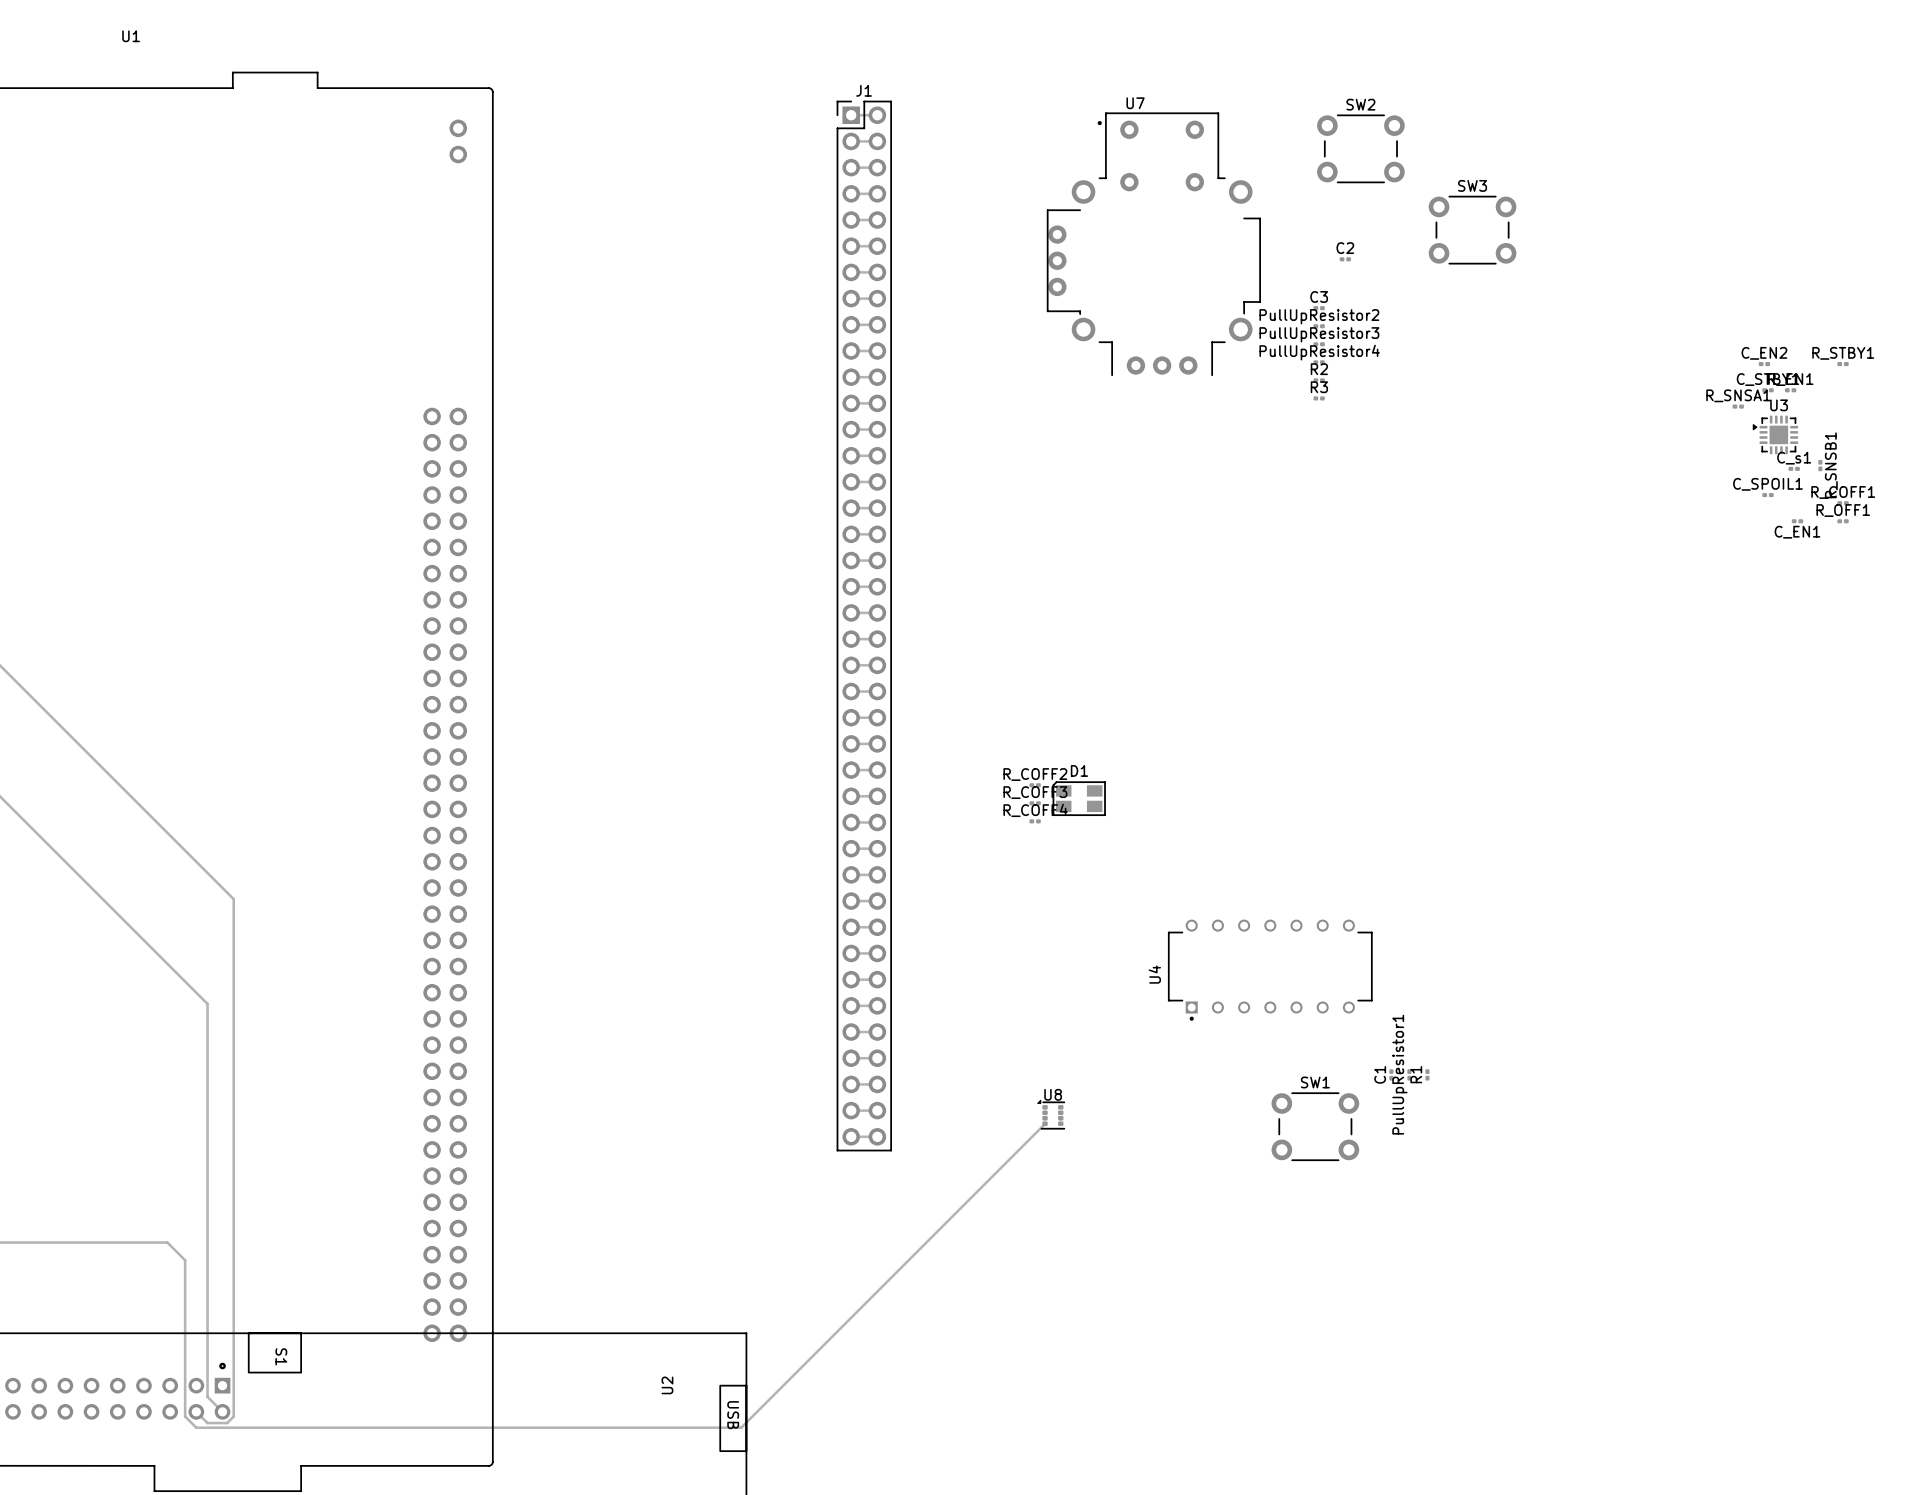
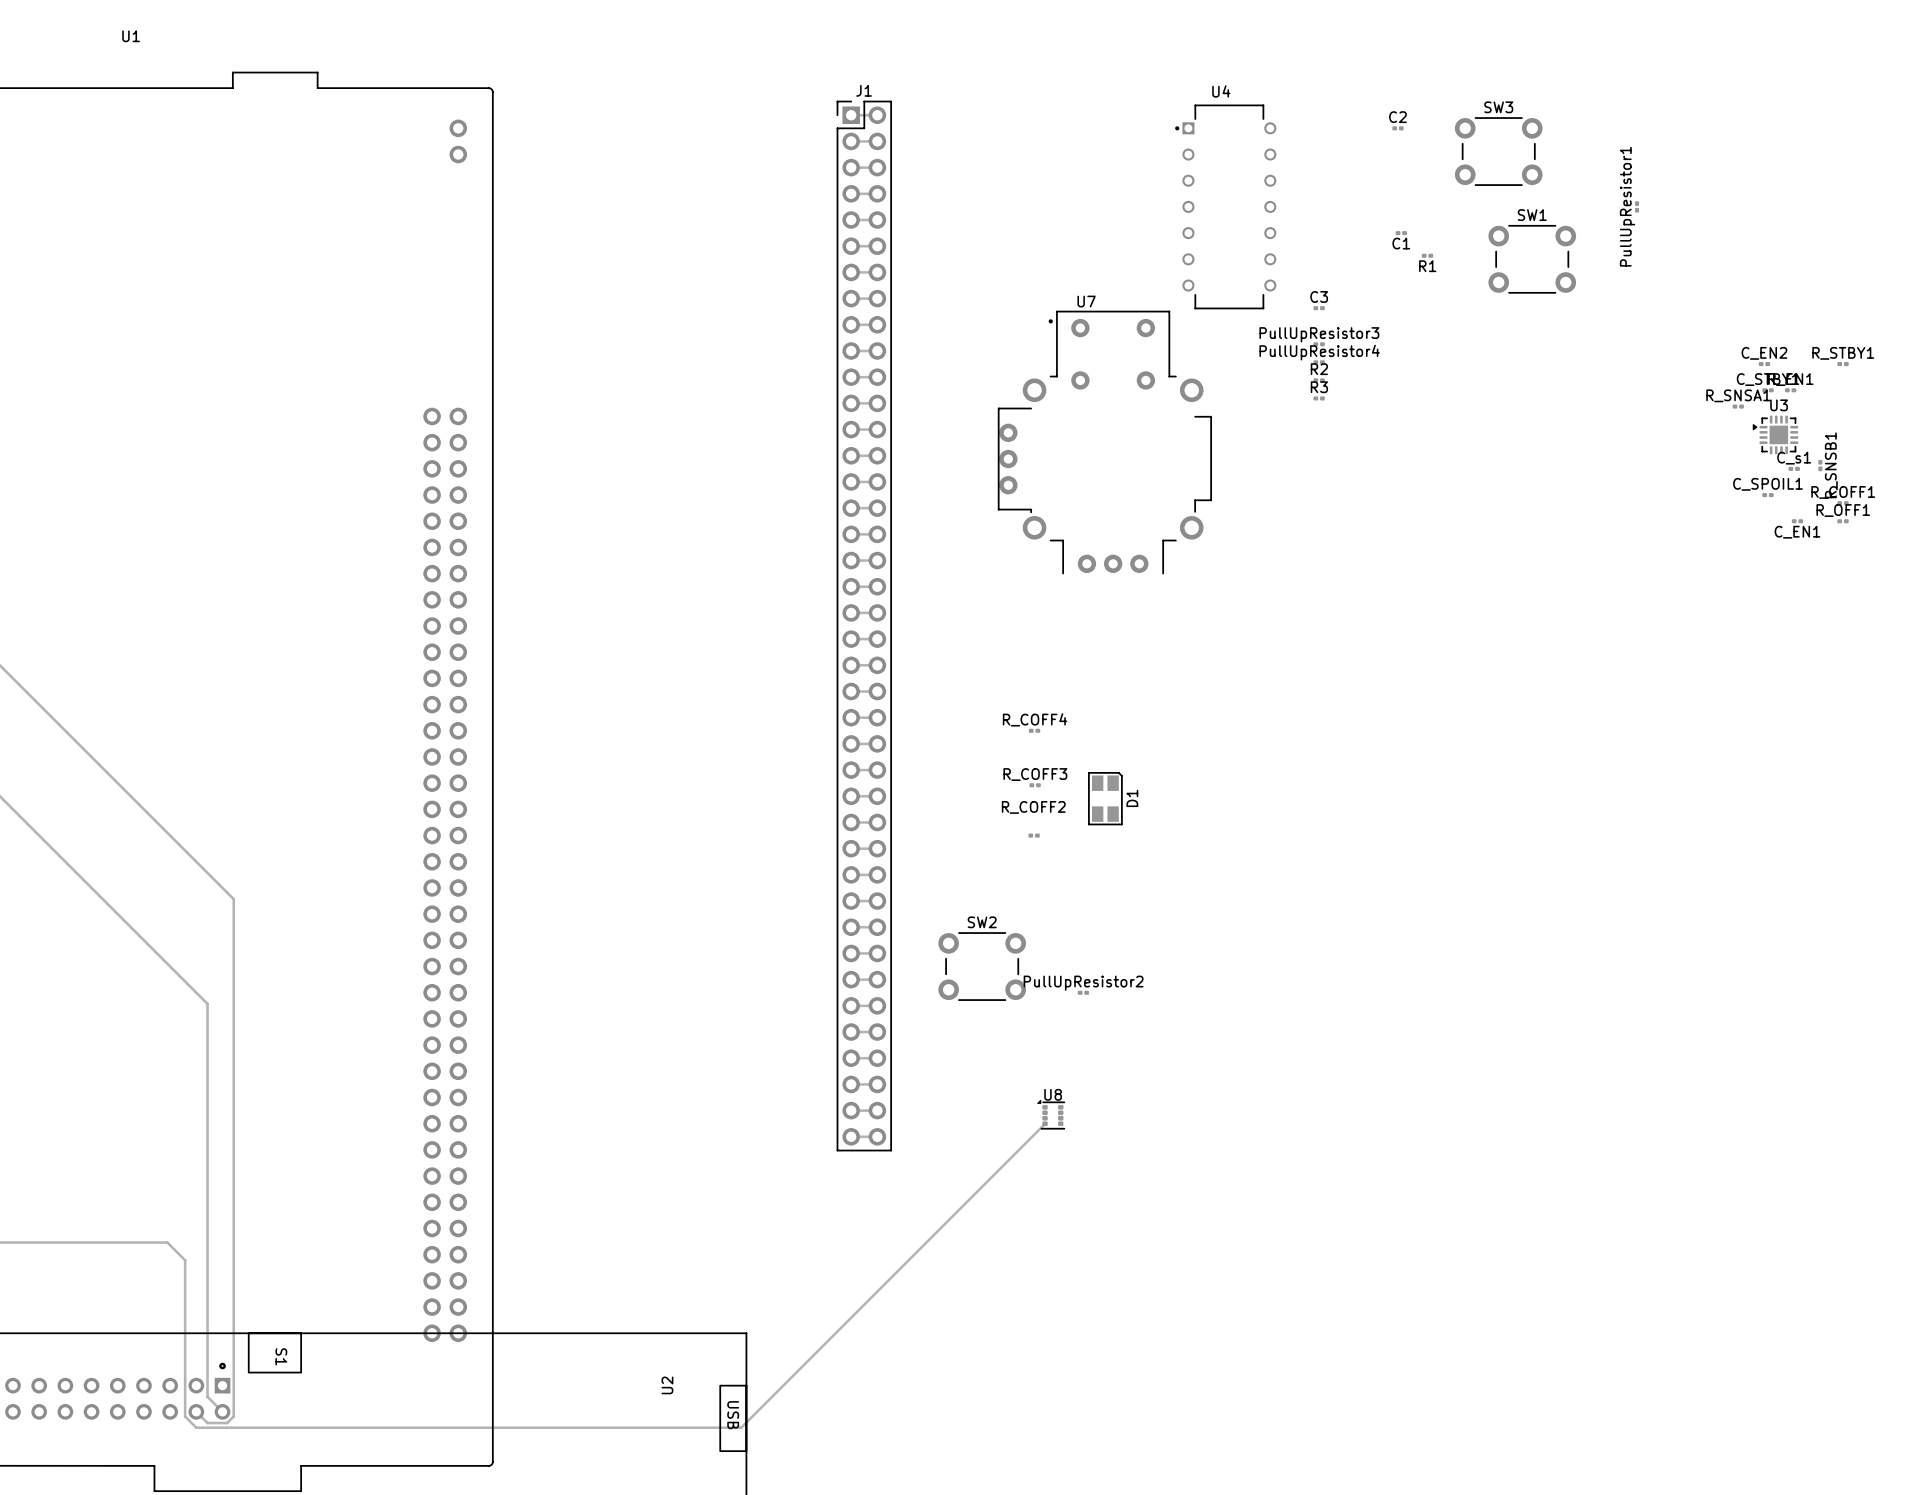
SW2 position: (1360, 148) -> (982, 966)
SW3 position: (1472, 230) -> (1498, 151)
U7 position: (1153, 244) -> (1104, 442)
C2 position: (1345, 259) -> (1397, 128)
PullUpResistor2 position: (1319, 326) -> (1083, 992)
R_COFF2 name: R_COFF2 (1035, 774) -> R_COFF3 (1035, 774)
D1 rotation: 0° (1079, 798) -> 90° clockwise (1105, 798)
R_COFF3: (1035, 803) -> none
R_COFF4 position: (1035, 821) -> (1034, 730)
R_COFF2: none -> (1034, 835)
U4 rotation: 0° (1270, 970) -> 90° clockwise (1225, 206)
U4 position: (1270, 970) -> (1225, 206)
C1 rotation: 0° (1391, 1074) -> 90° clockwise (1401, 233)
C1 position: (1391, 1074) -> (1401, 233)
PullUpResistor1 position: (1409, 1074) -> (1637, 206)
R1 rotation: 0° (1427, 1074) -> 90° clockwise (1427, 255)
R1 position: (1427, 1074) -> (1427, 255)
SW1 position: (1315, 1126) -> (1532, 259)

